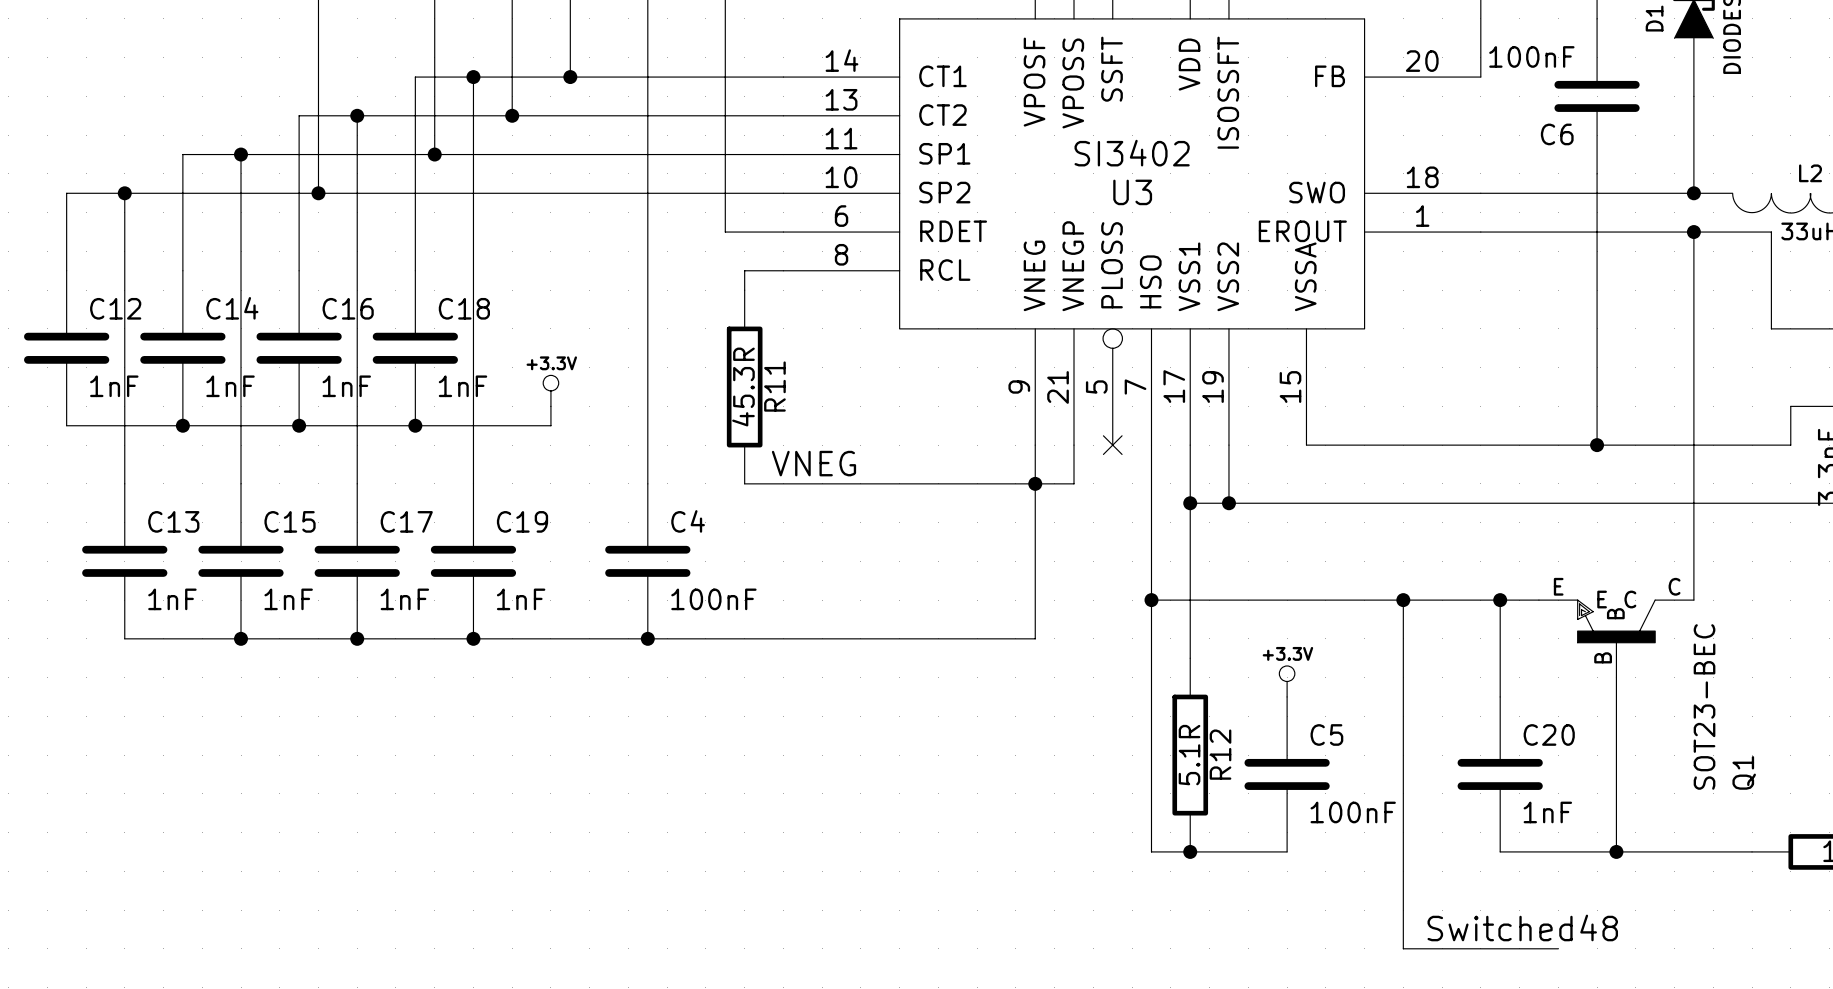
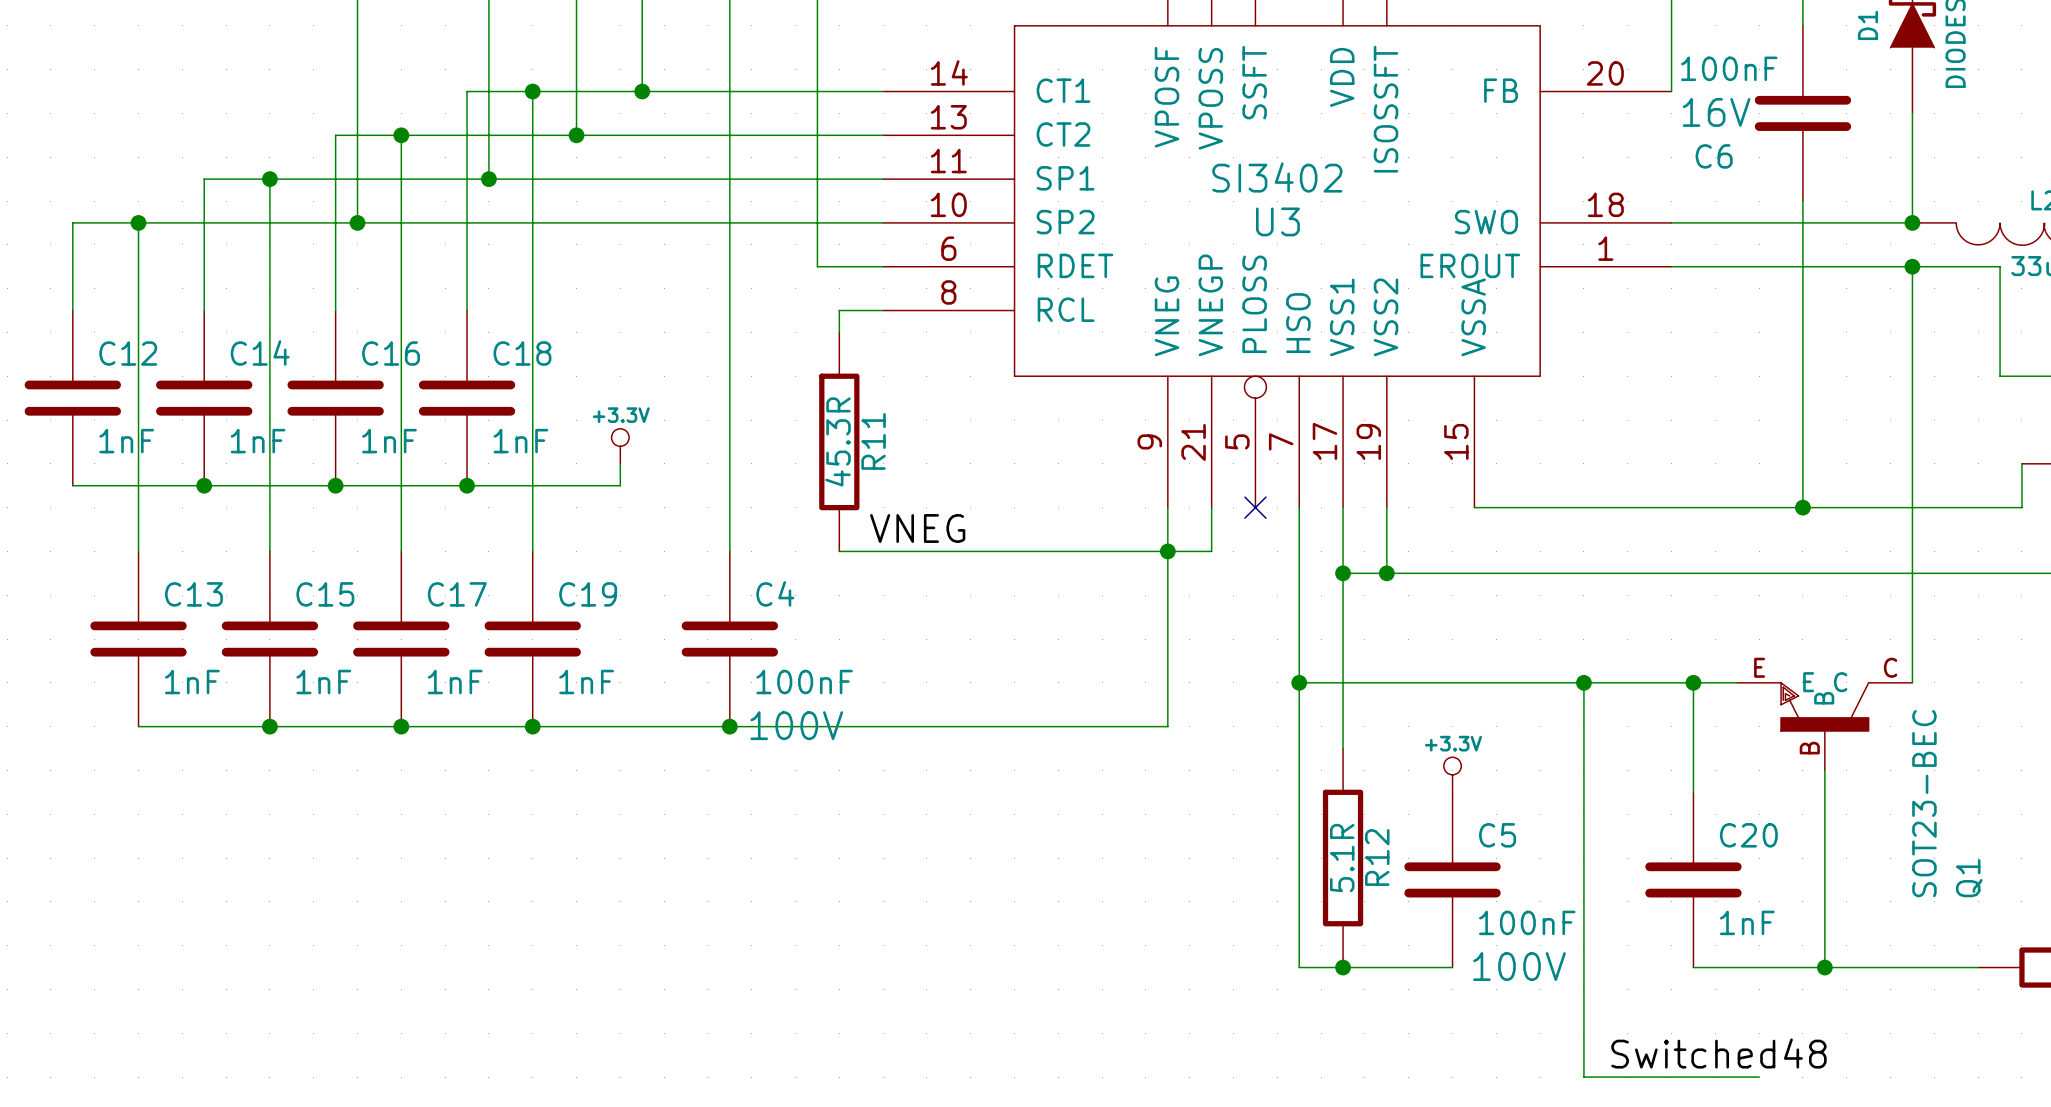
C6 text: none -> 16V (1716, 112)
C6 name position: C6 (1557, 134) -> C6 (1714, 156)
C4 text: none -> 100V (796, 725)
C5 text: none -> 100V (1519, 966)

